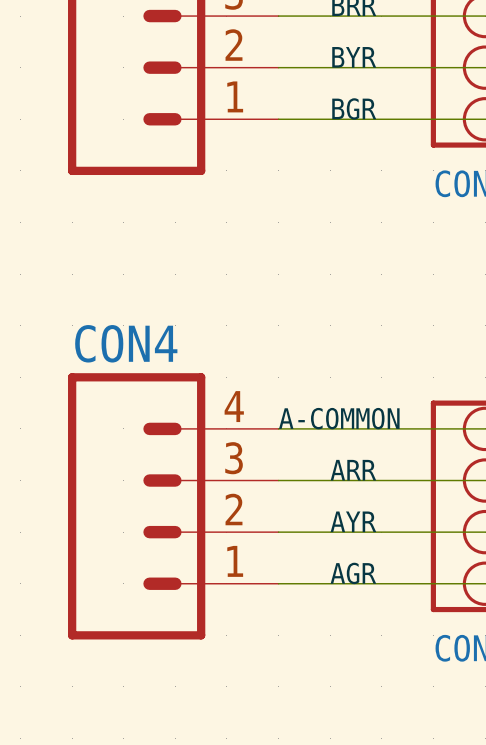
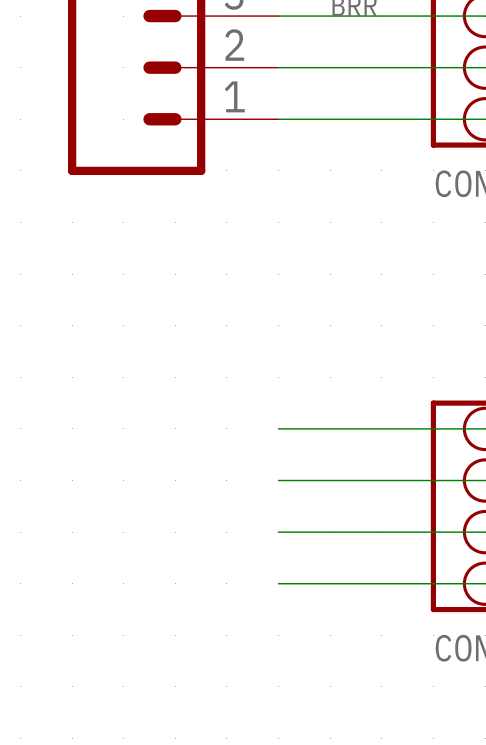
label: BYR (354, 57) -> none
label: BGR (354, 108) -> none
label: A-COMMON (339, 418) -> none
label: ARR (353, 470) -> none
CON4: (173, 506) -> none
label: AYR (353, 521) -> none
label: AGR (353, 573) -> none

